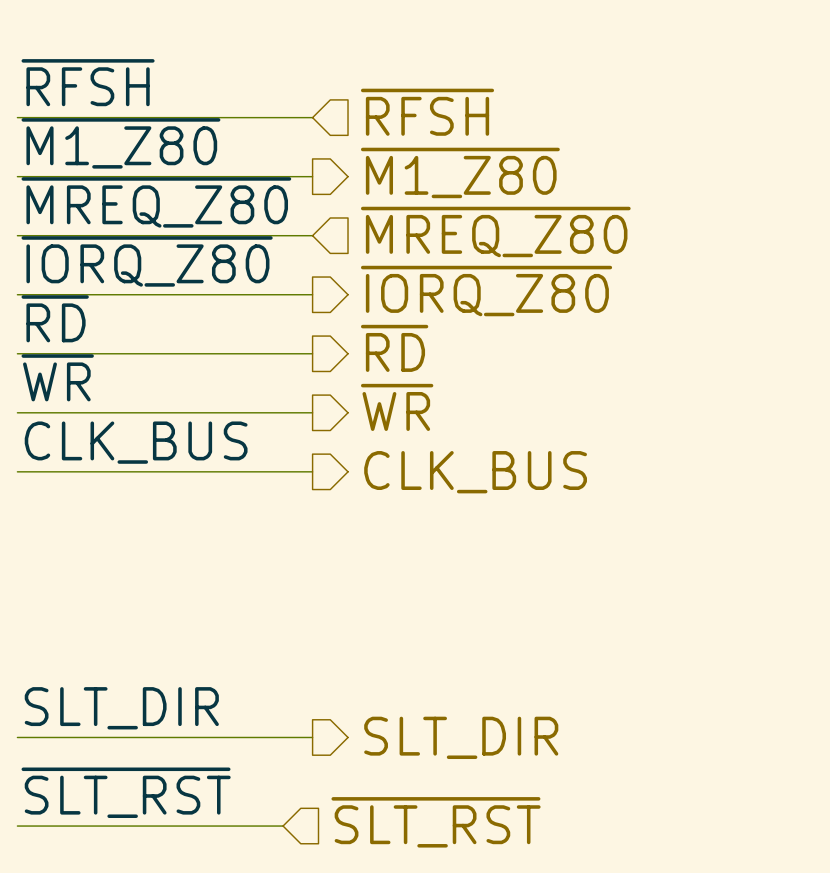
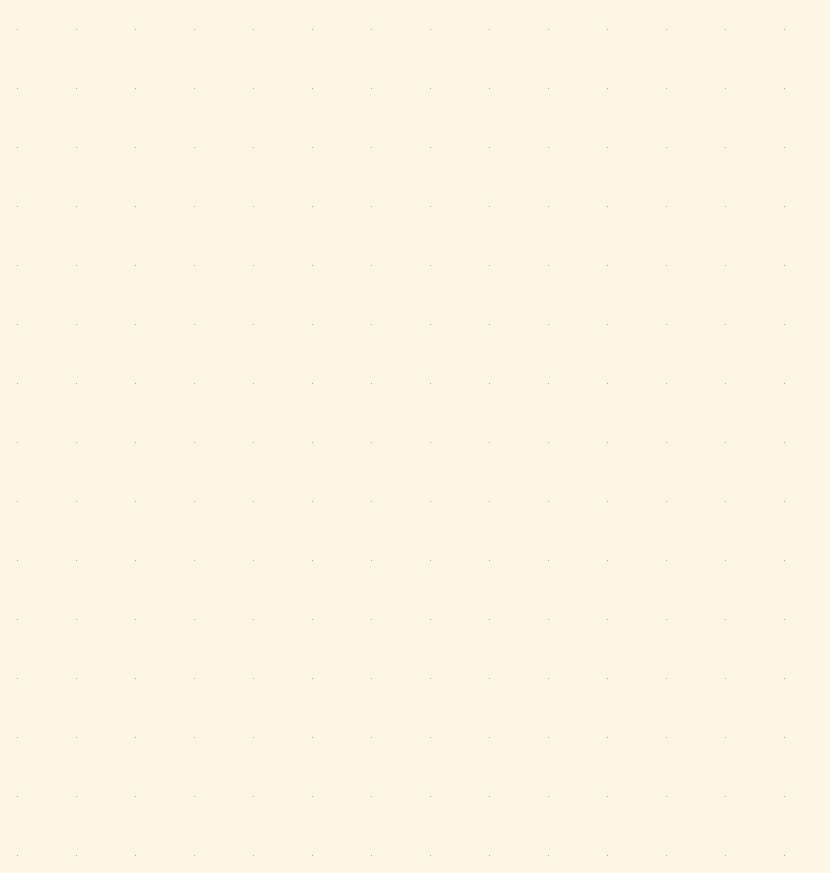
label: ~{RFSH} (88, 82) -> none
hierarchical label: ~{RFSH} (427, 112) -> none
wire: (17, 117) (312, 117) -> none
label: ~{M1_Z80} (120, 143) -> none
hierarchical label: ~{M1_Z80} (460, 172) -> none
wire: (17, 176) (312, 176) -> none
label: ~{MREQ_Z80} (156, 202) -> none
hierarchical label: ~{MREQ_Z80} (495, 231) -> none
wire: (17, 235) (312, 235) -> none
label: ~{IORQ_Z80} (147, 261) -> none
hierarchical label: ~{IORQ_Z80} (486, 291) -> none
wire: (17, 294) (312, 294) -> none
label: ~{RD} (55, 318) -> none
hierarchical label: ~{RD} (394, 348) -> none
wire: (17, 353) (312, 353) -> none
label: ~{WR} (57, 377) -> none
hierarchical label: ~{WR} (397, 407) -> none
wire: (17, 412) (312, 412) -> none
label: CLK_BUS (136, 442) -> none
wire: (17, 471) (312, 471) -> none
hierarchical label: CLK_BUS (475, 472) -> none
label: SLT_DIR (121, 708) -> none
wire: (17, 737) (312, 737) -> none
hierarchical label: SLT_DIR (461, 737) -> none
label: ~{SLT_RST} (126, 792) -> none
hierarchical label: ~{SLT_RST} (436, 822) -> none
wire: (17, 826) (283, 826) -> none

